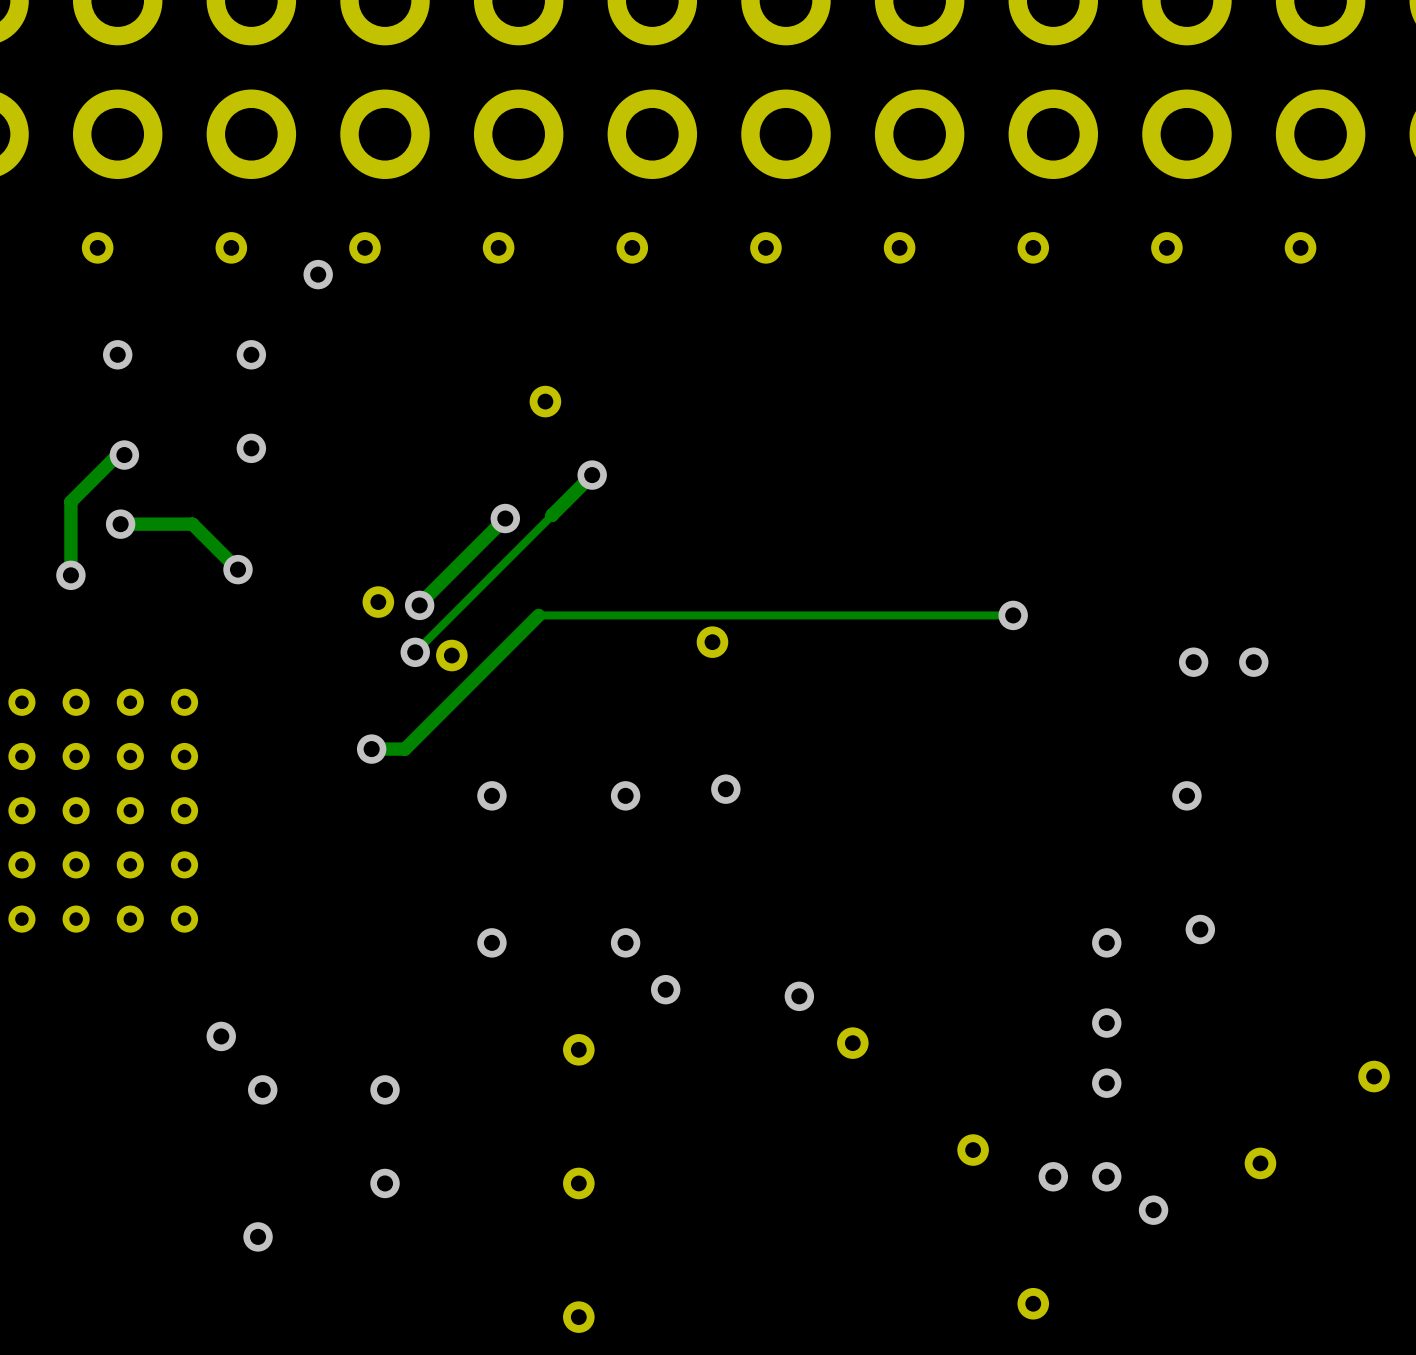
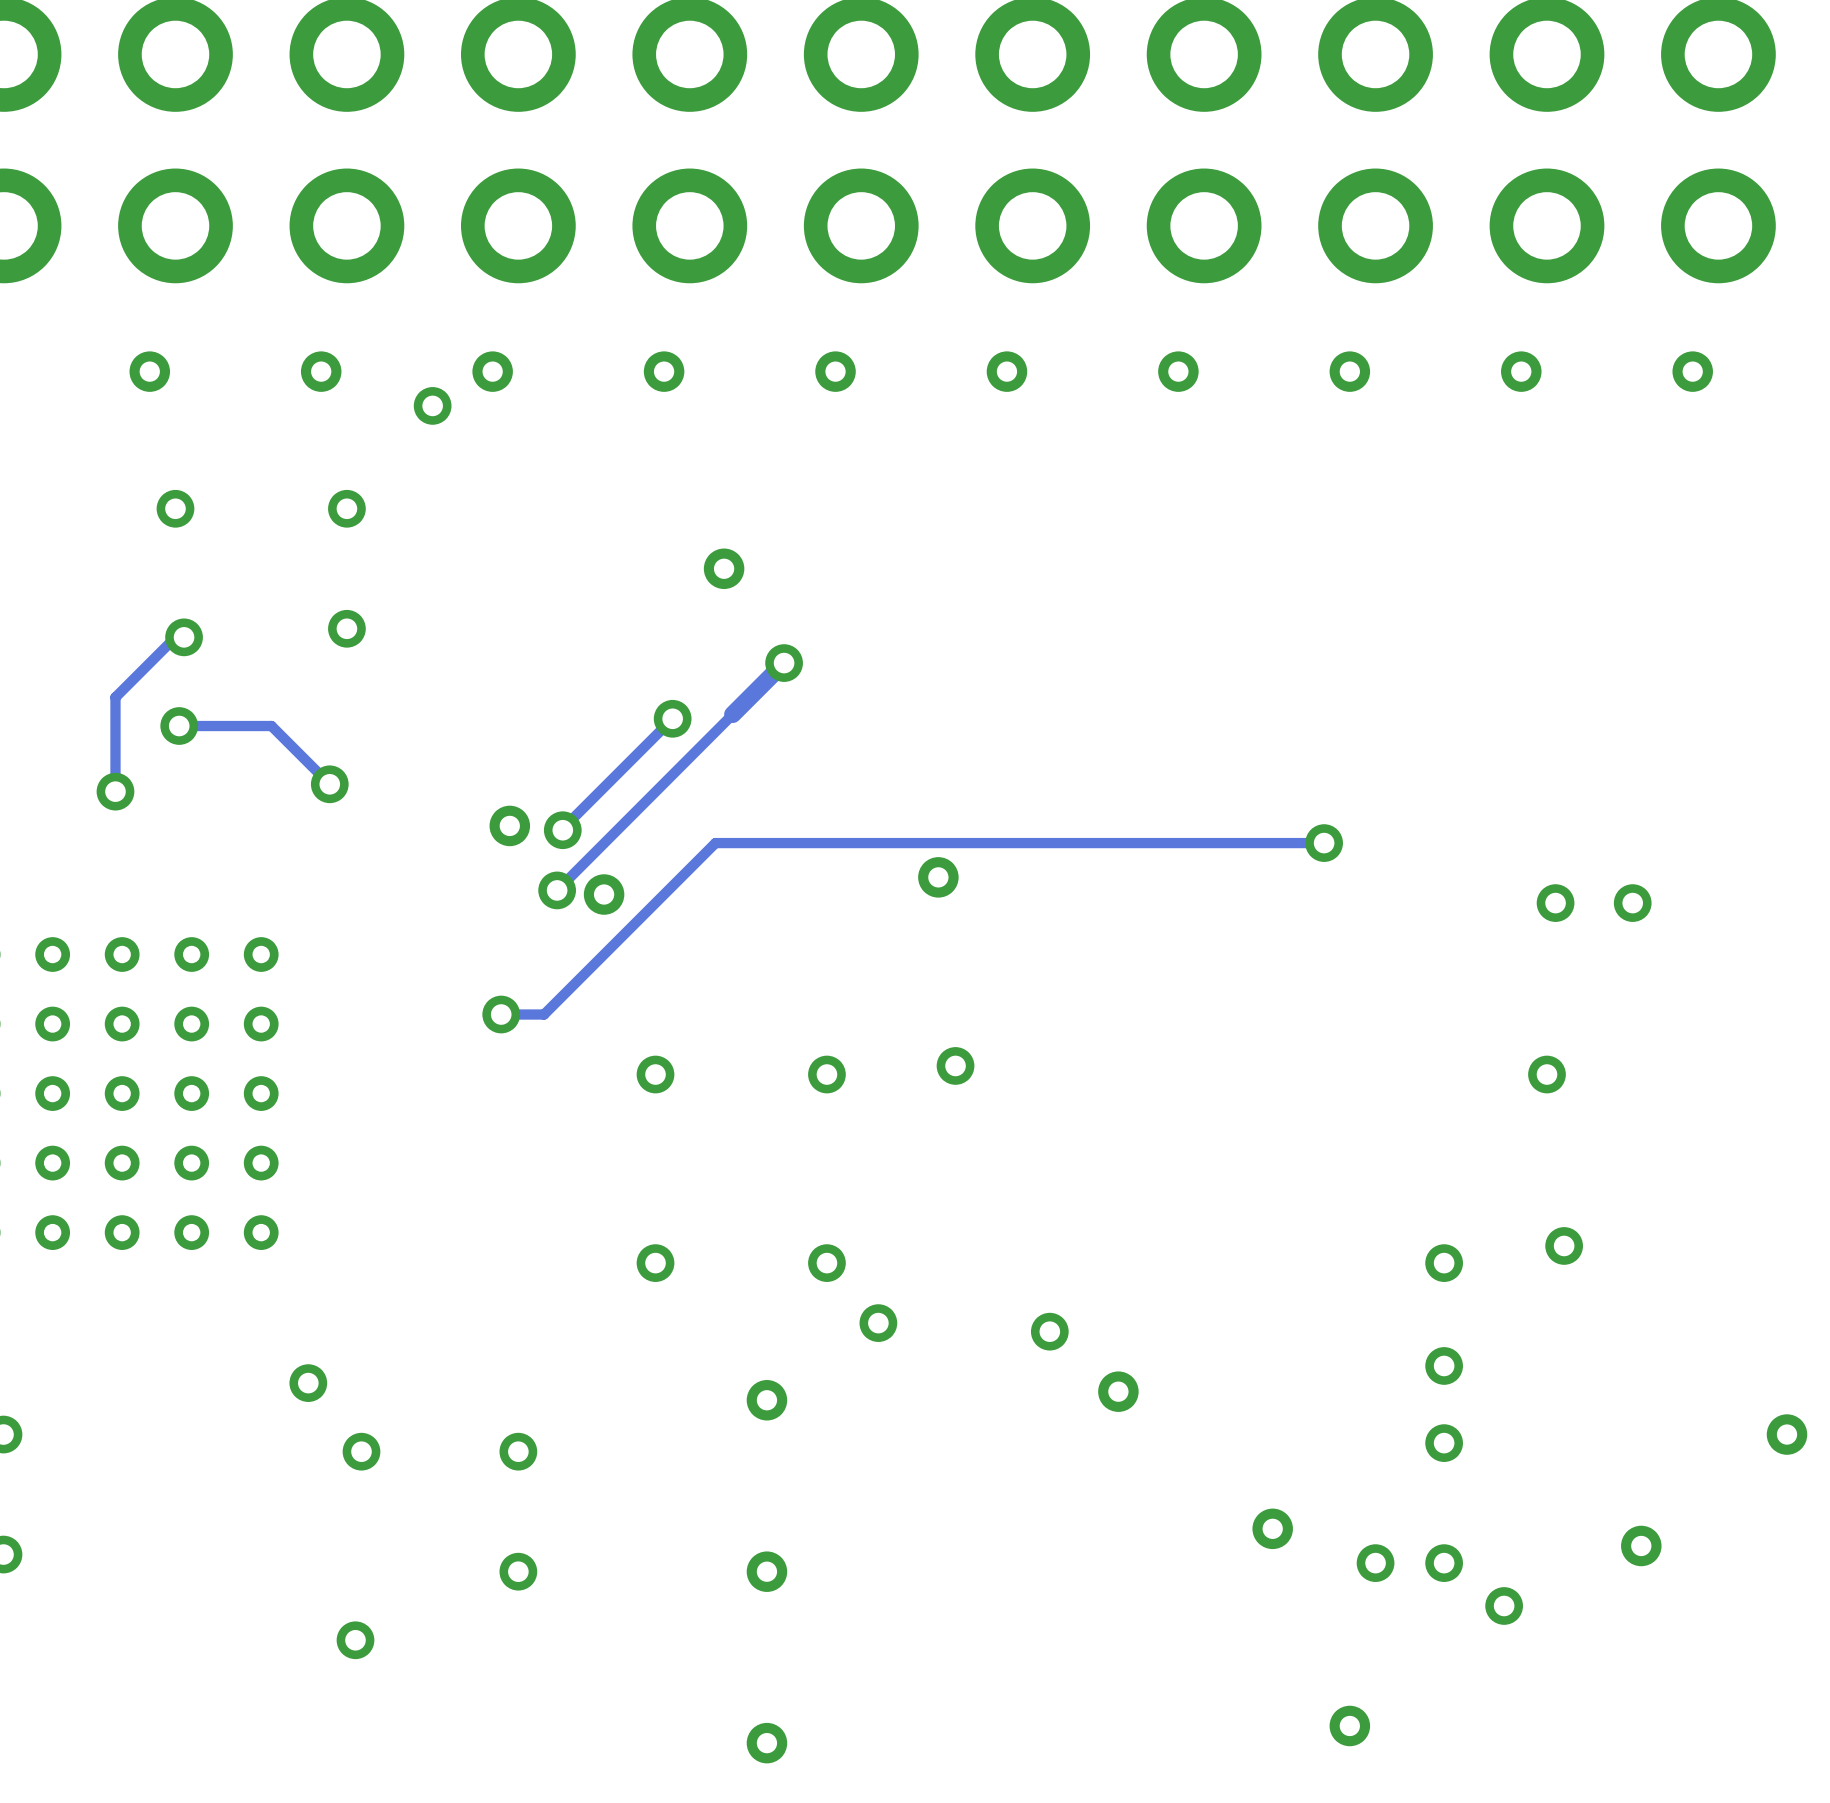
track width: thick (124, 455) (117, 455) (70, 501) (70, 575) -> thin (184, 637) (175, 637) (115, 697) (115, 791)
track width: thick (505, 518) (419, 605) -> thin (672, 718) (562, 830)
track width: thick (120, 524) (192, 524) (238, 569) -> thin (179, 726) (271, 726) (329, 784)
track width: thick (538, 615) (405, 749) (371, 749) -> thin (715, 843) (544, 1014) (501, 1014)

